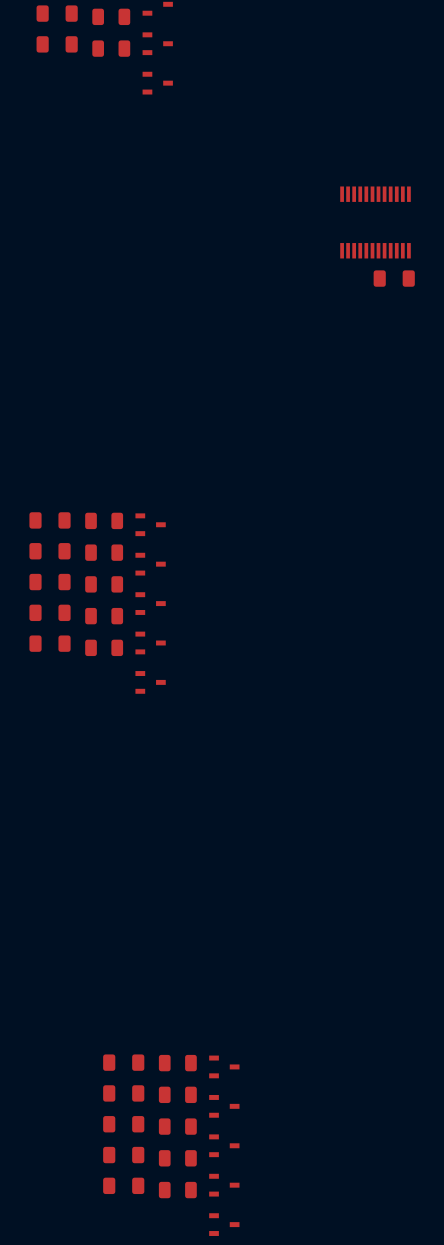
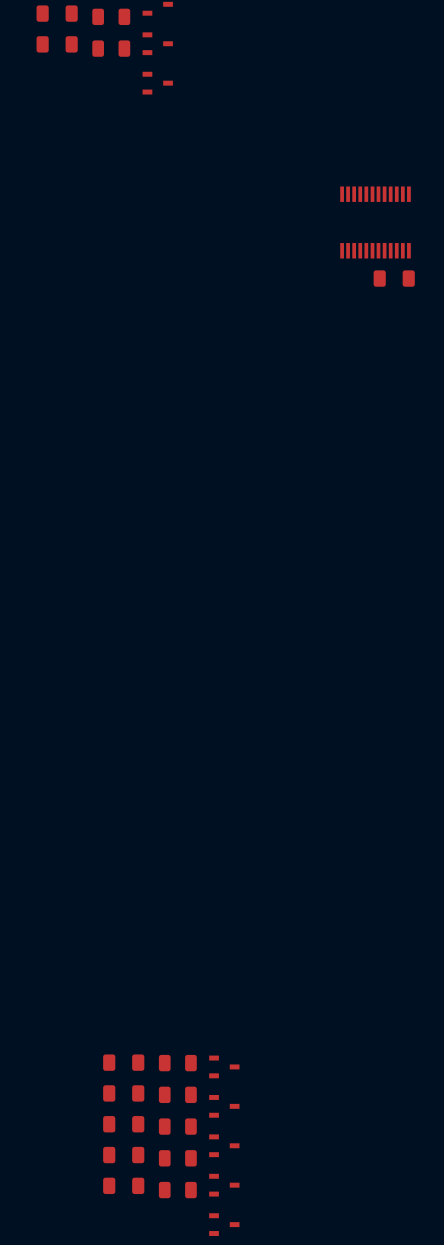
part: (50, 520) -> none
part: (104, 520) -> none
part: (150, 524) -> none
part: (50, 551) -> none
part: (104, 552) -> none
part: (150, 564) -> none
part: (50, 582) -> none
part: (104, 584) -> none
part: (150, 603) -> none
part: (50, 612) -> none
part: (104, 616) -> none
part: (150, 642) -> none
part: (50, 643) -> none
part: (104, 647) -> none
part: (150, 682) -> none

